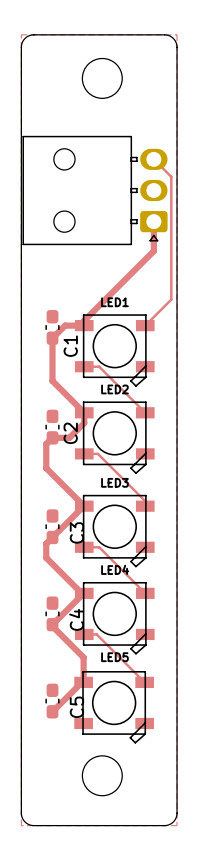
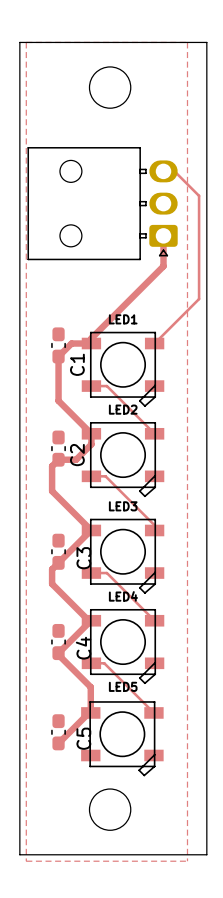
board edge: (33, 34) (25, 38) (21, 47) (21, 813) (25, 821) (33, 825) (165, 825) (173, 821) (176, 814) (177, 47) (173, 38) (164, 34) -> (39, 42) (19, 42) (19, 854) (206, 854) (206, 42) (174, 42)
track: (153, 159) (171, 176) (171, 299) -> (163, 171) (174, 171) (199, 195) (199, 299) (181, 316)

